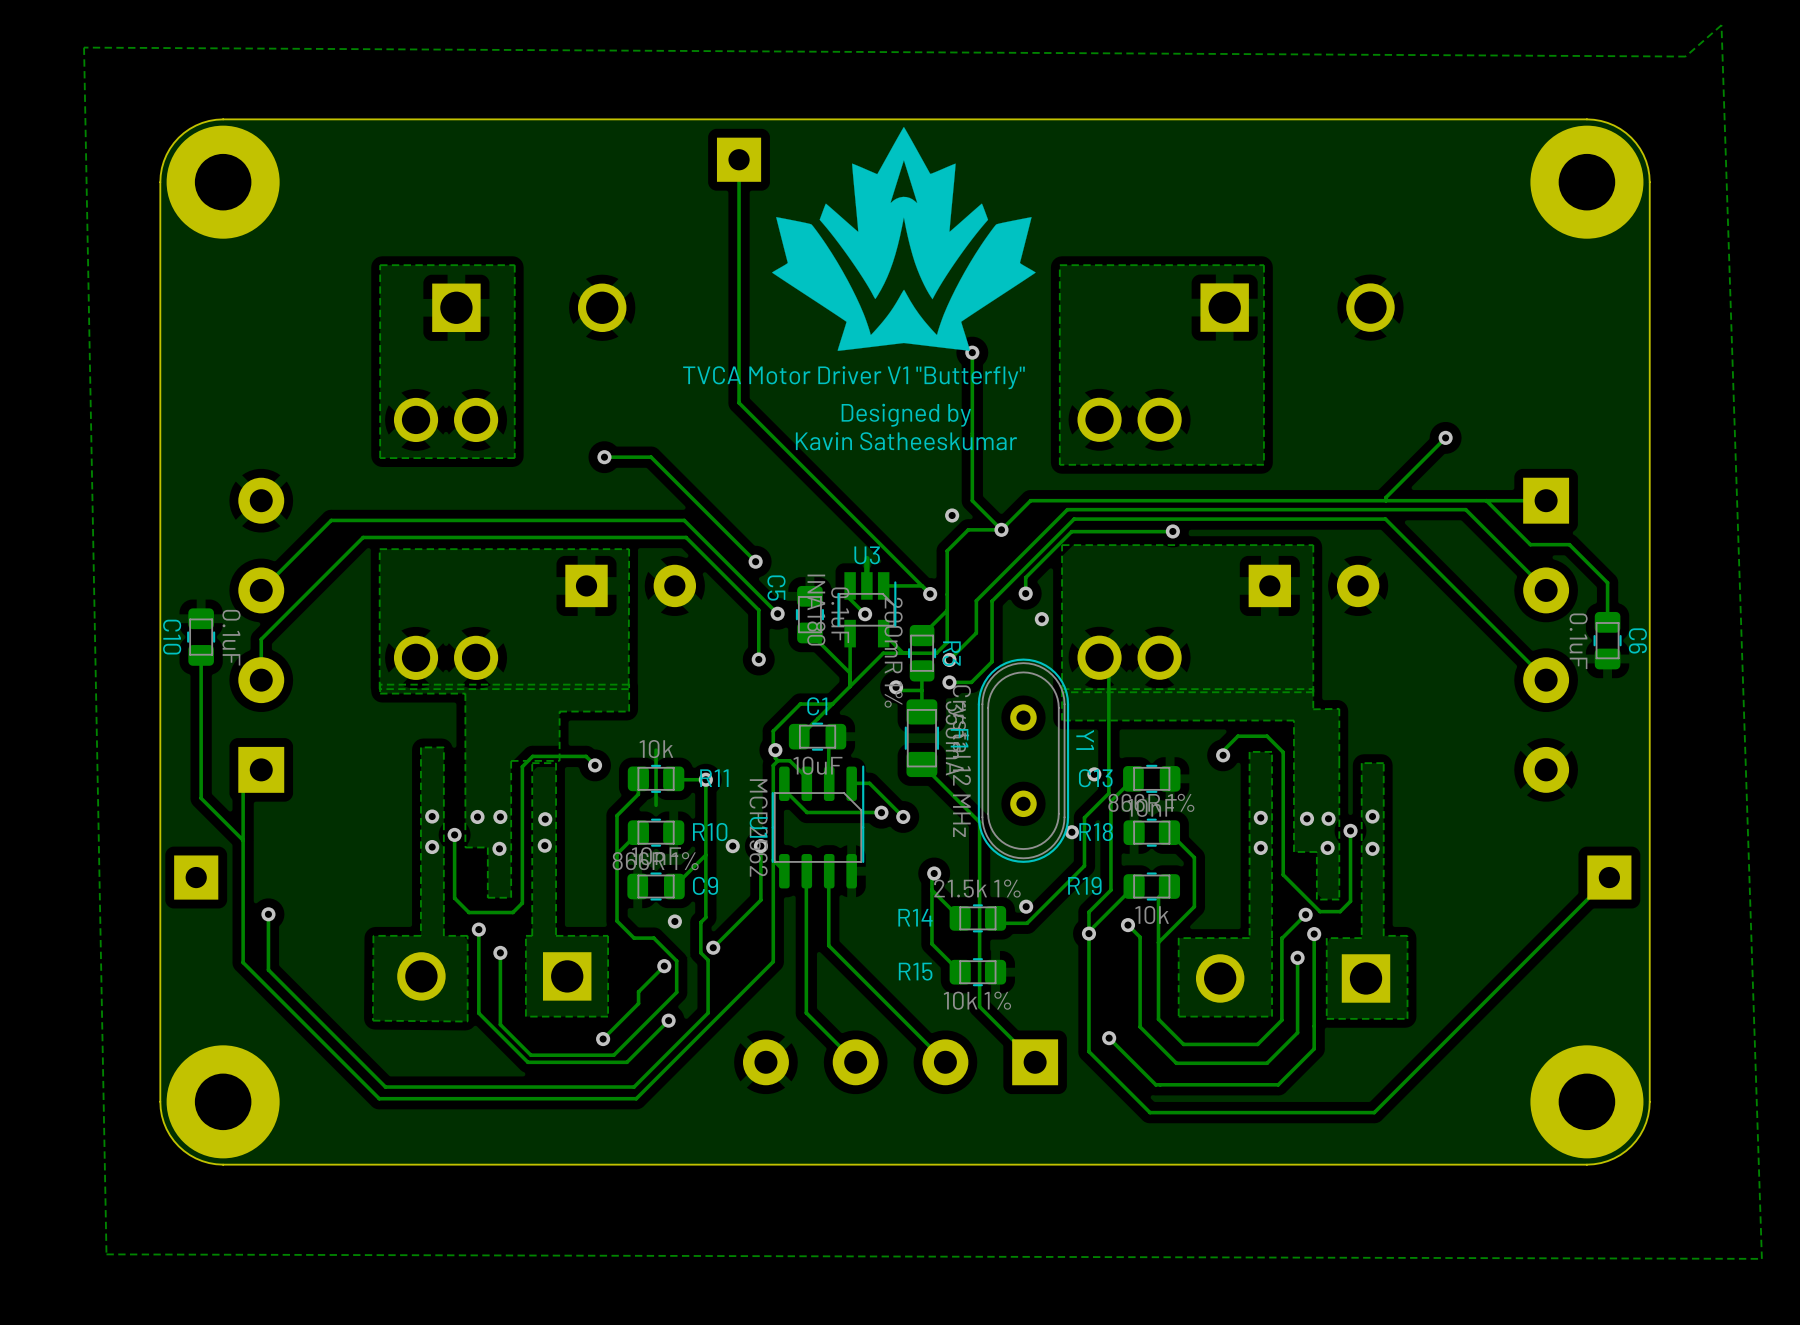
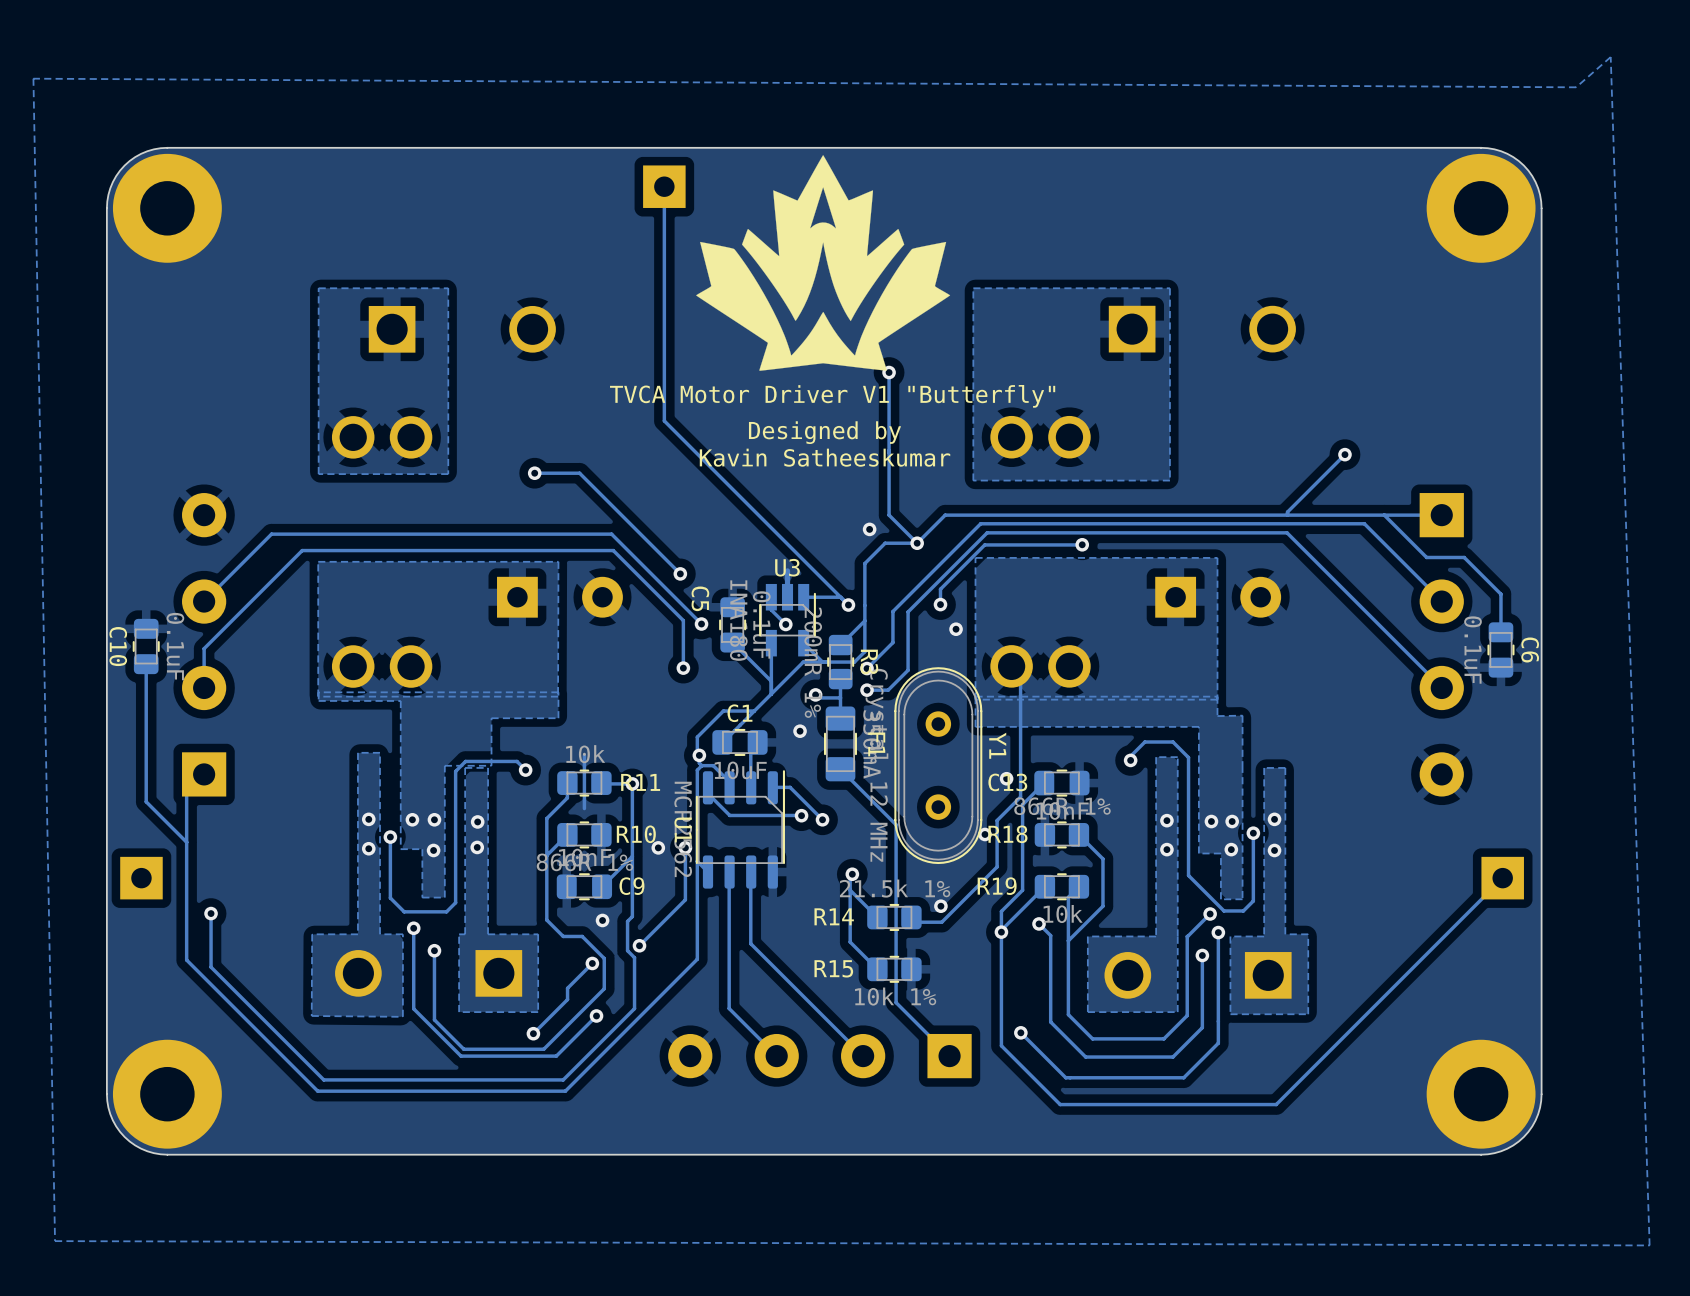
via: none -> (800, 731)

